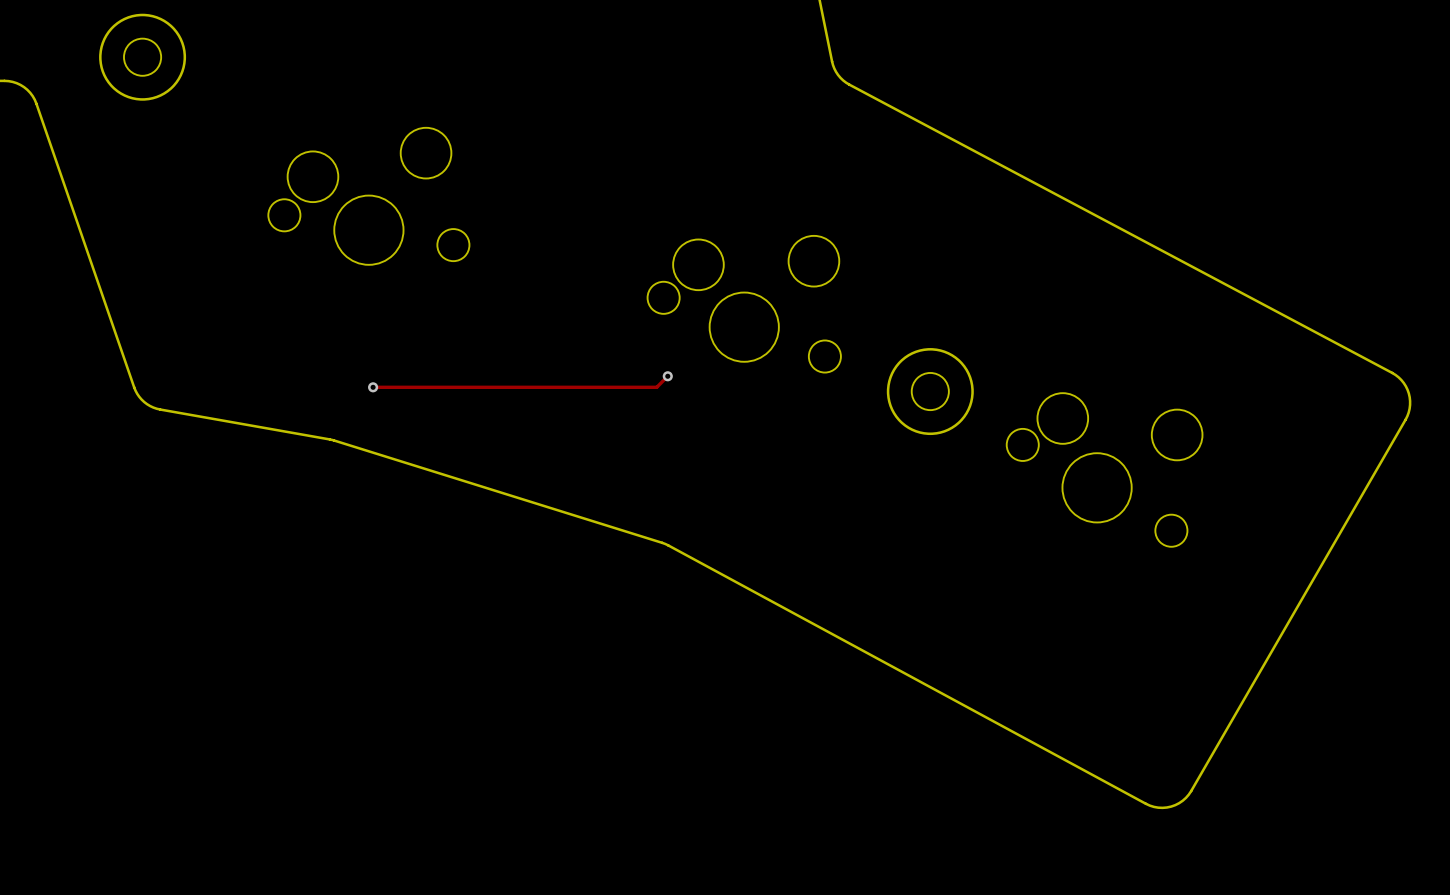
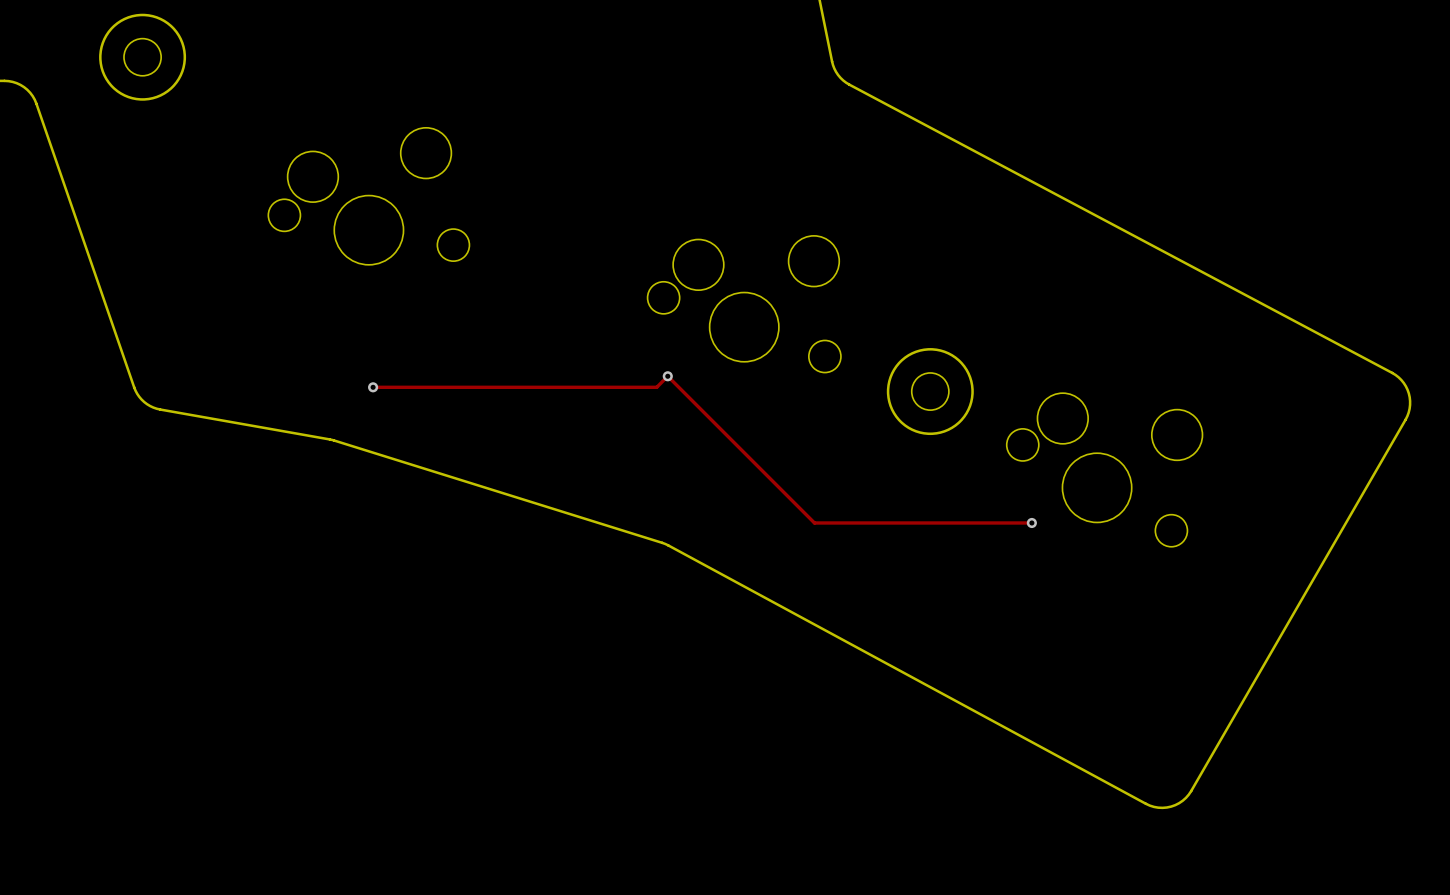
track: none -> (667, 376) (814, 522) (1031, 522)
via: none -> (1031, 522)

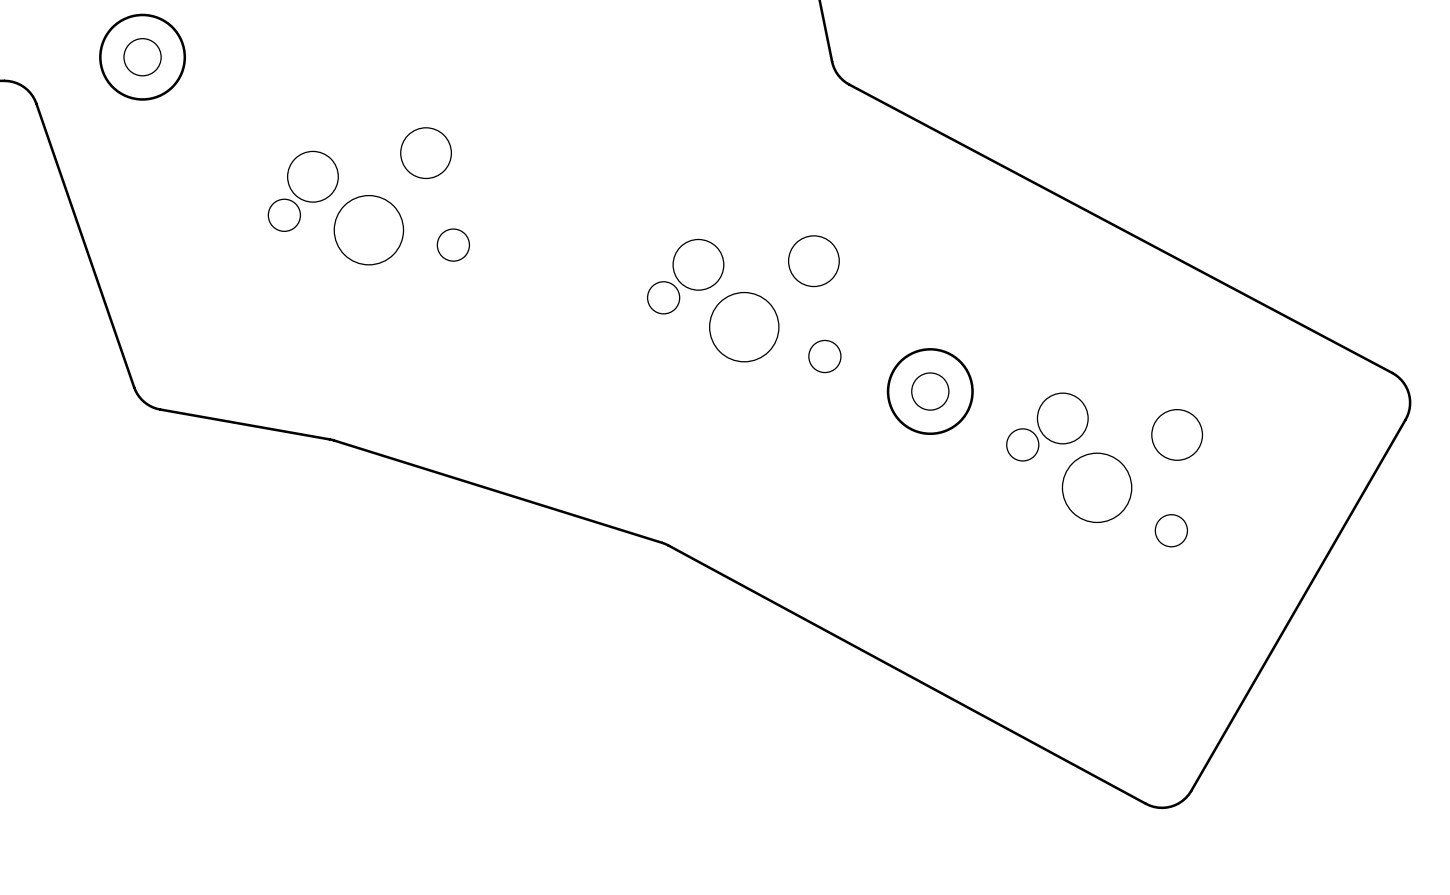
via: (667, 376) -> none
track: (373, 387) (656, 387) (667, 376) (814, 522) (1031, 522) -> none
via: (373, 387) -> none
via: (1031, 522) -> none

